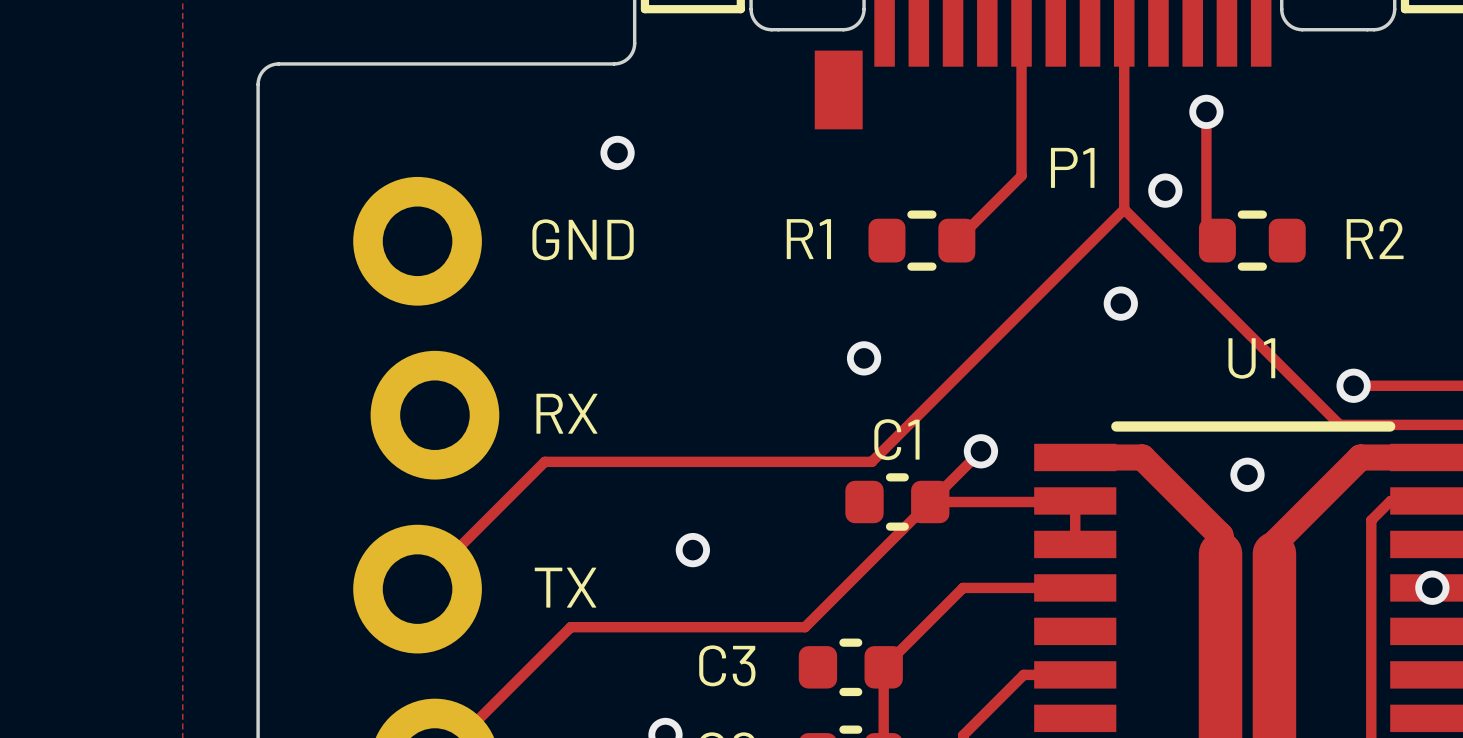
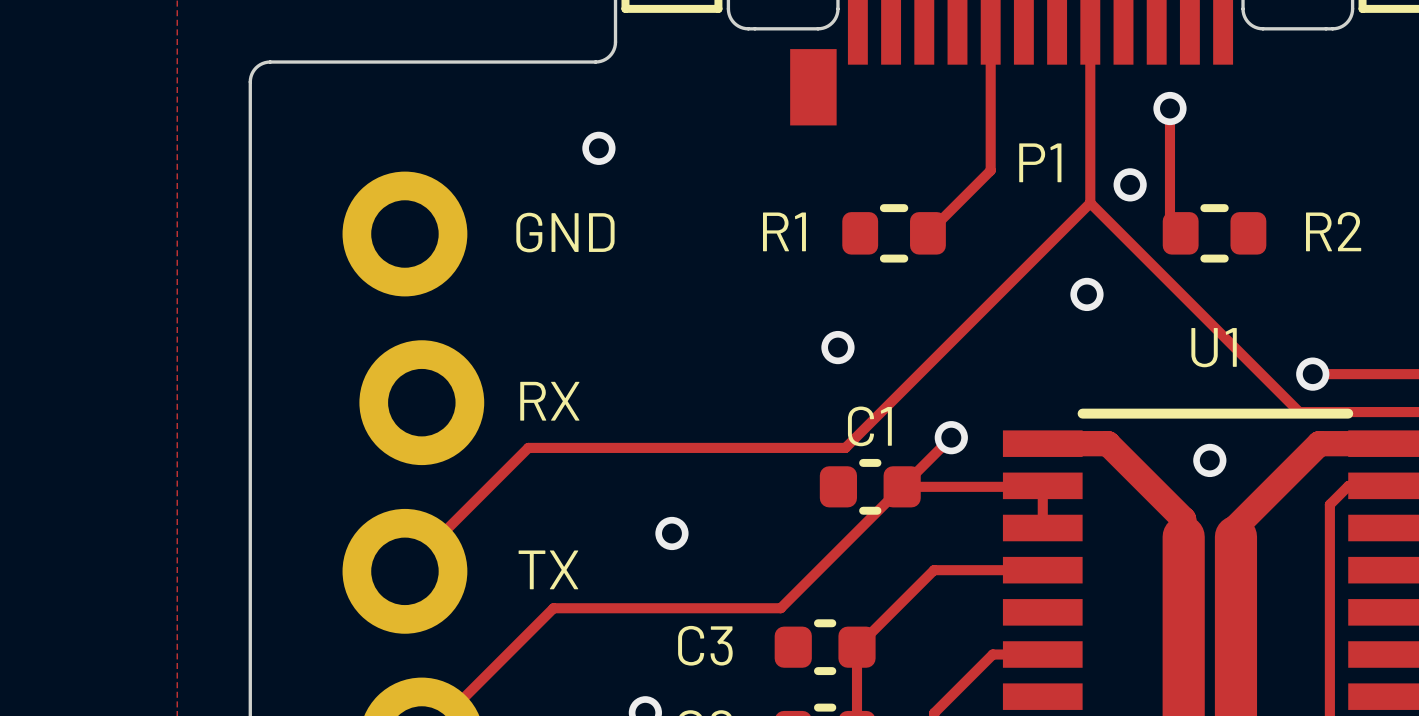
via: (1432, 587) -> none

